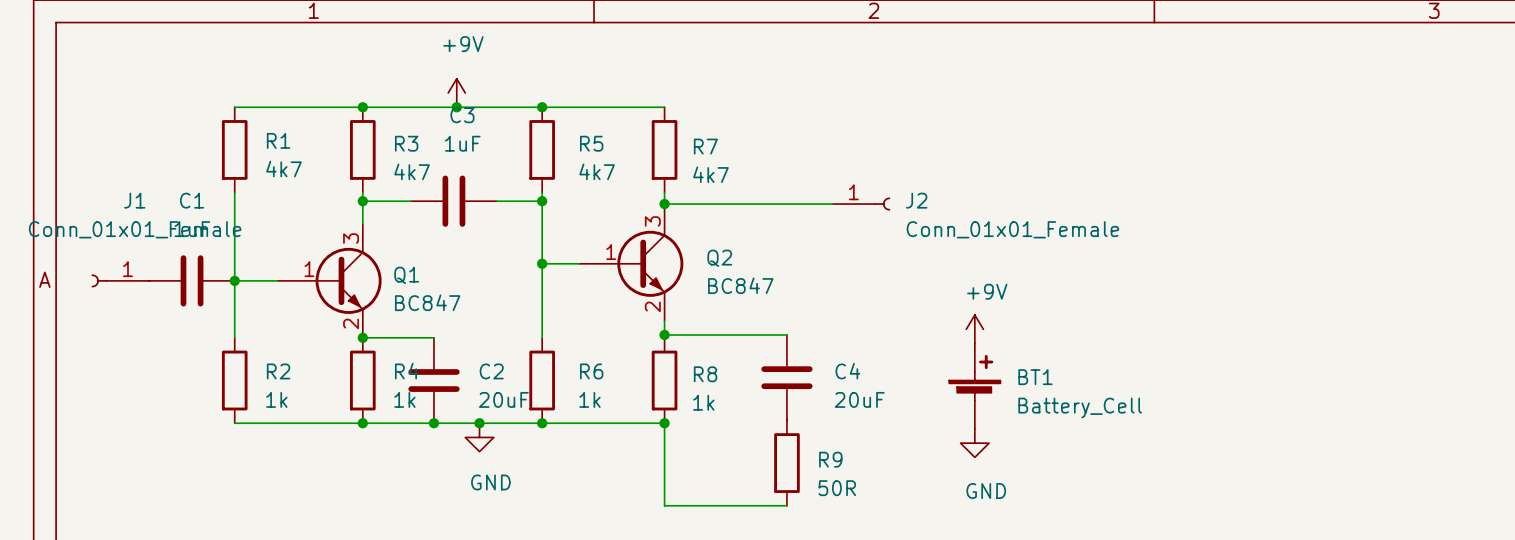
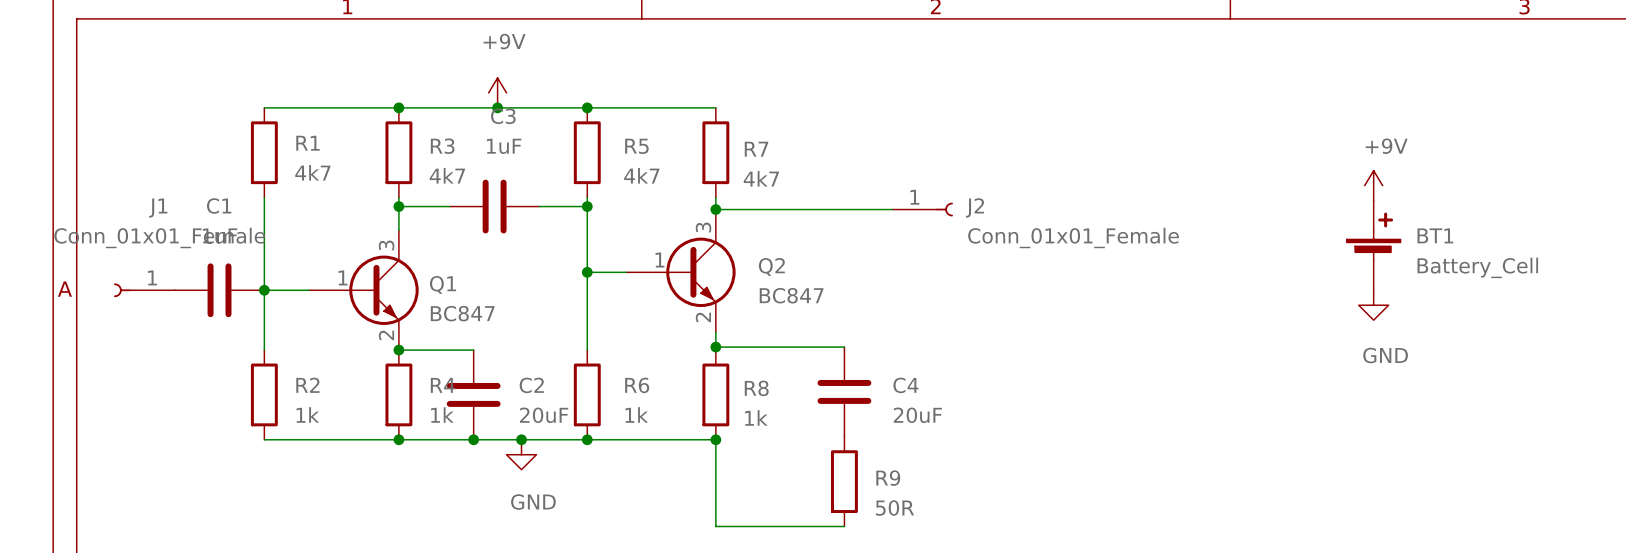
power symbol: none -> +9V (1373, 185)
power symbol: none -> GND (1373, 305)
power symbol: +9V (974, 329) -> none
BT1 position: (974, 386) -> (1373, 245)
power symbol: GND (974, 443) -> none

